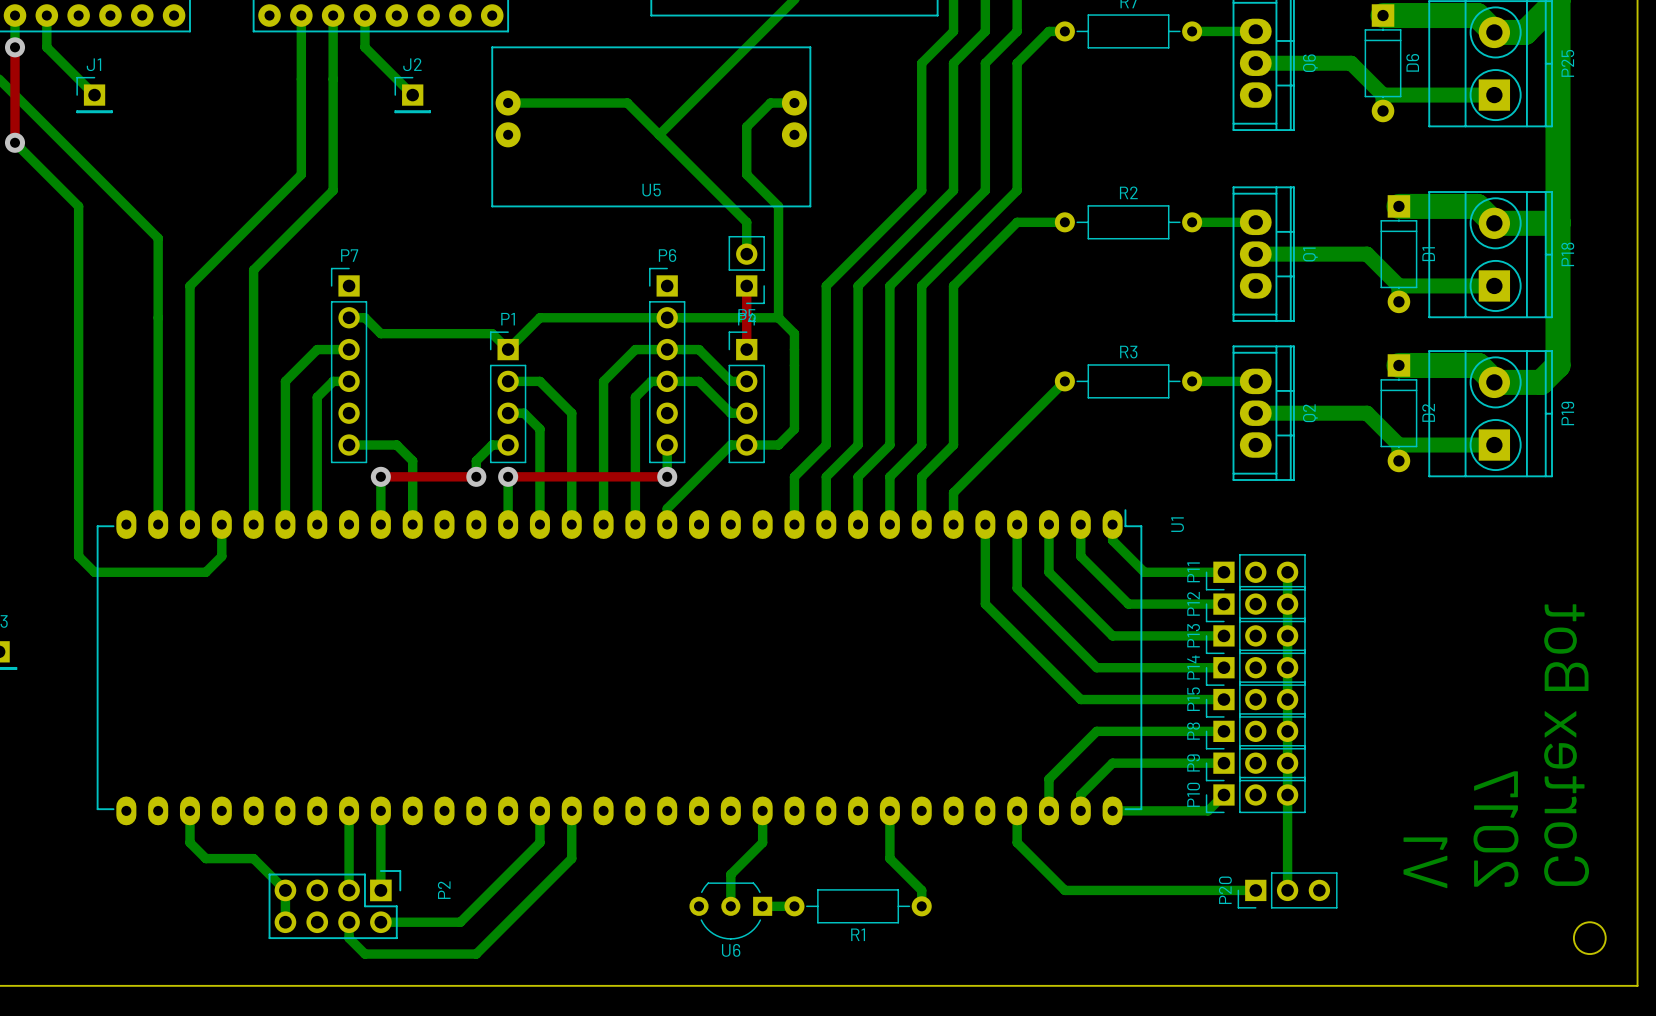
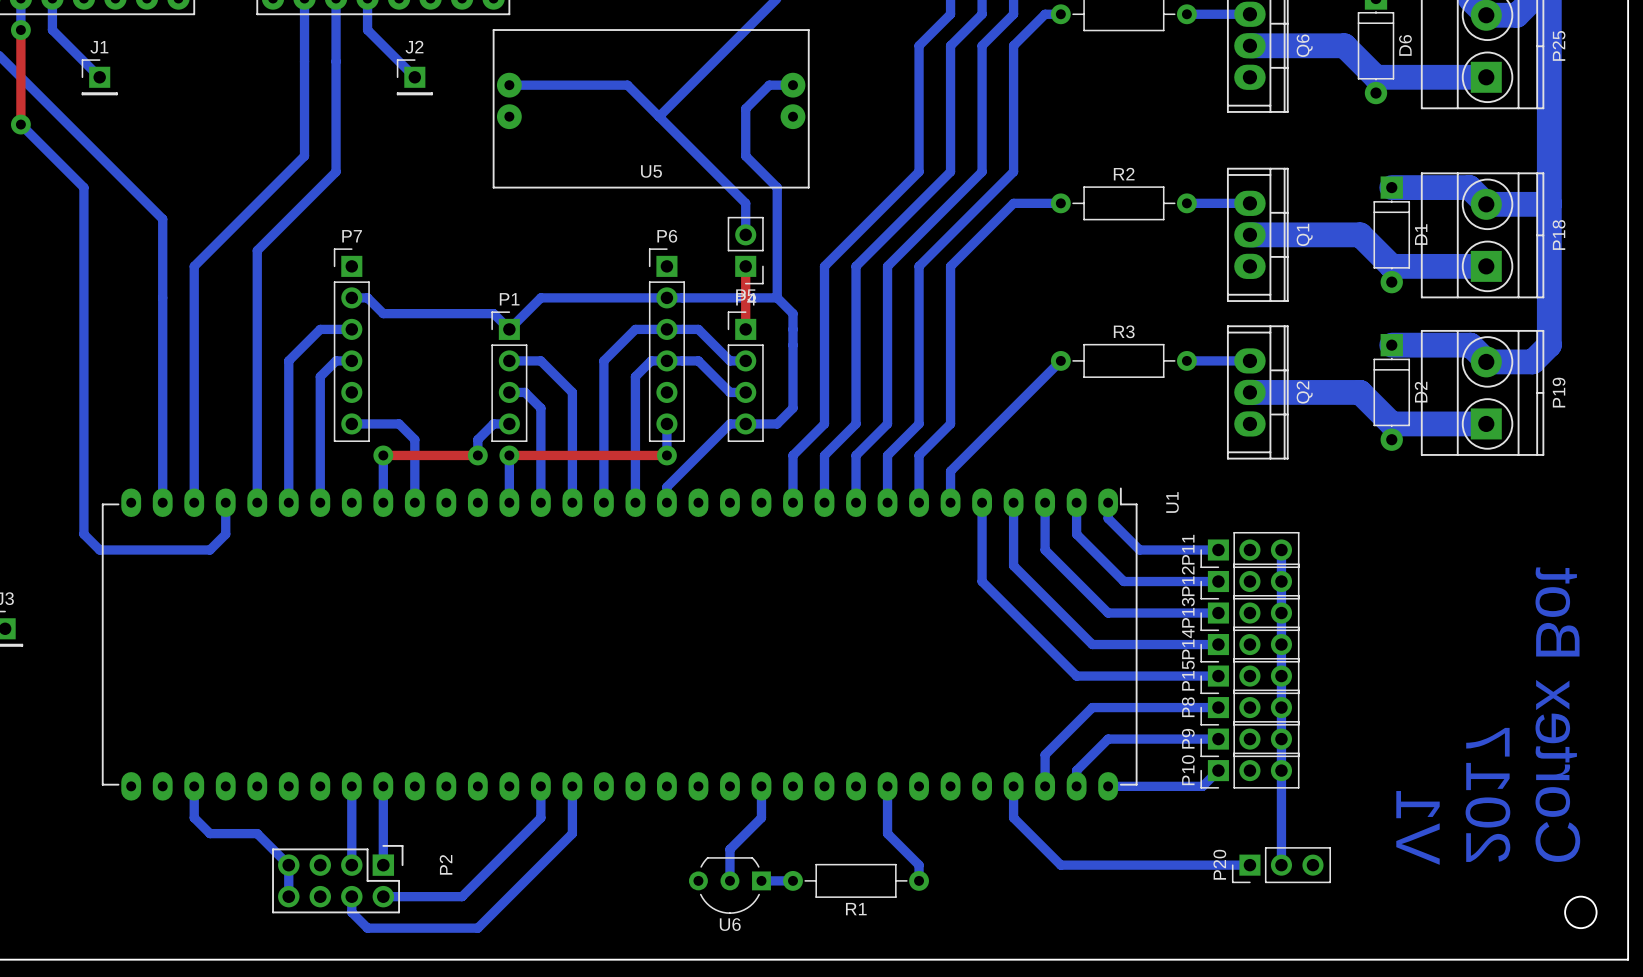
bottom track width: thin (1255, 63) (1351, 63) (1383, 95) (1494, 95) -> thick (1249, 45) (1344, 45) (1376, 77) (1486, 77)
bottom track width: thin (1255, 254) (1367, 254) (1398, 285) (1494, 285) -> thick (1249, 234) (1360, 234) (1391, 266) (1486, 266)
bottom track width: thin (1255, 413) (1367, 413) (1398, 445) (1494, 445) -> thick (1249, 392) (1360, 392) (1391, 423) (1486, 423)

